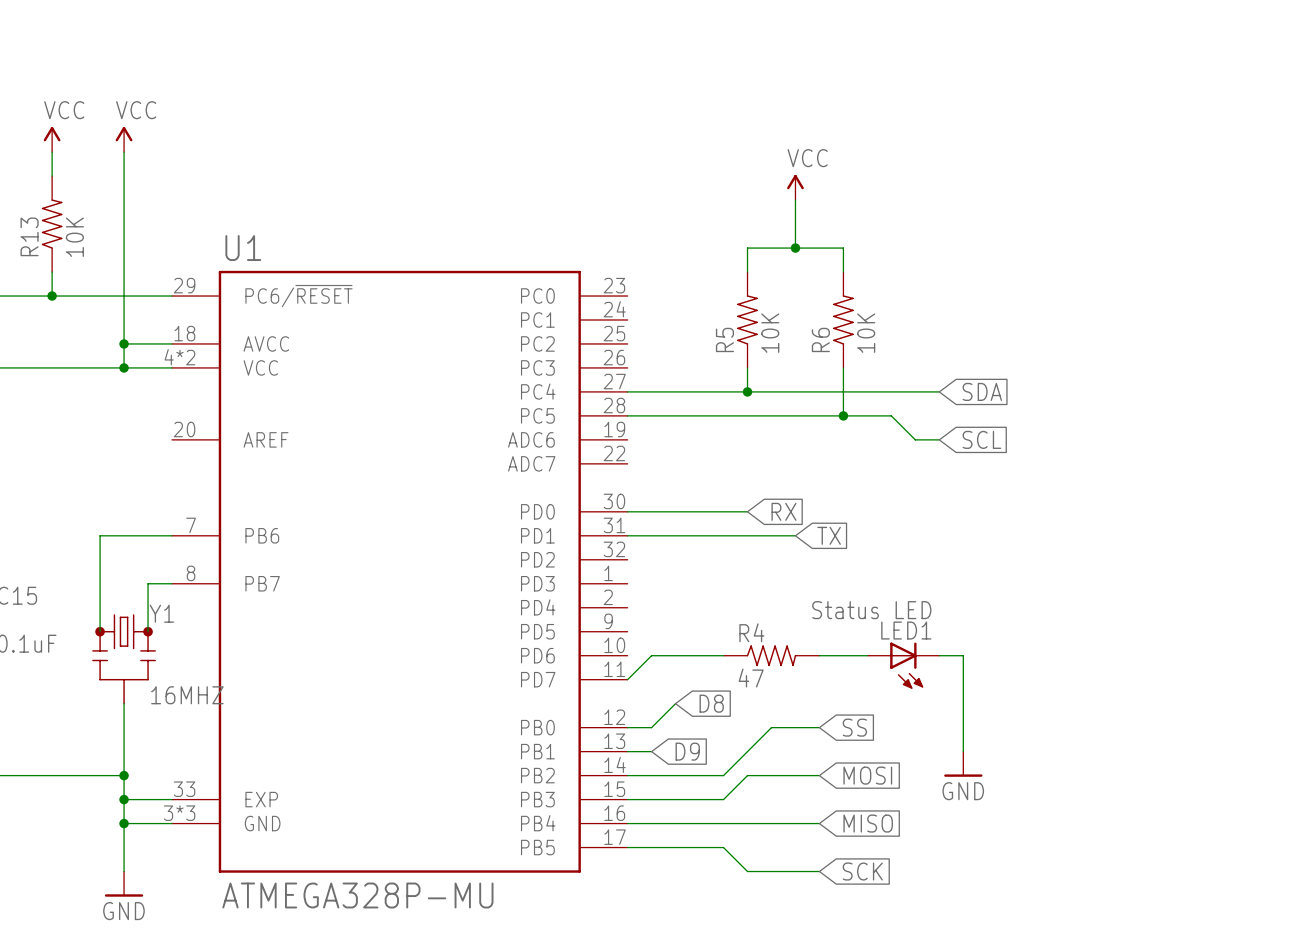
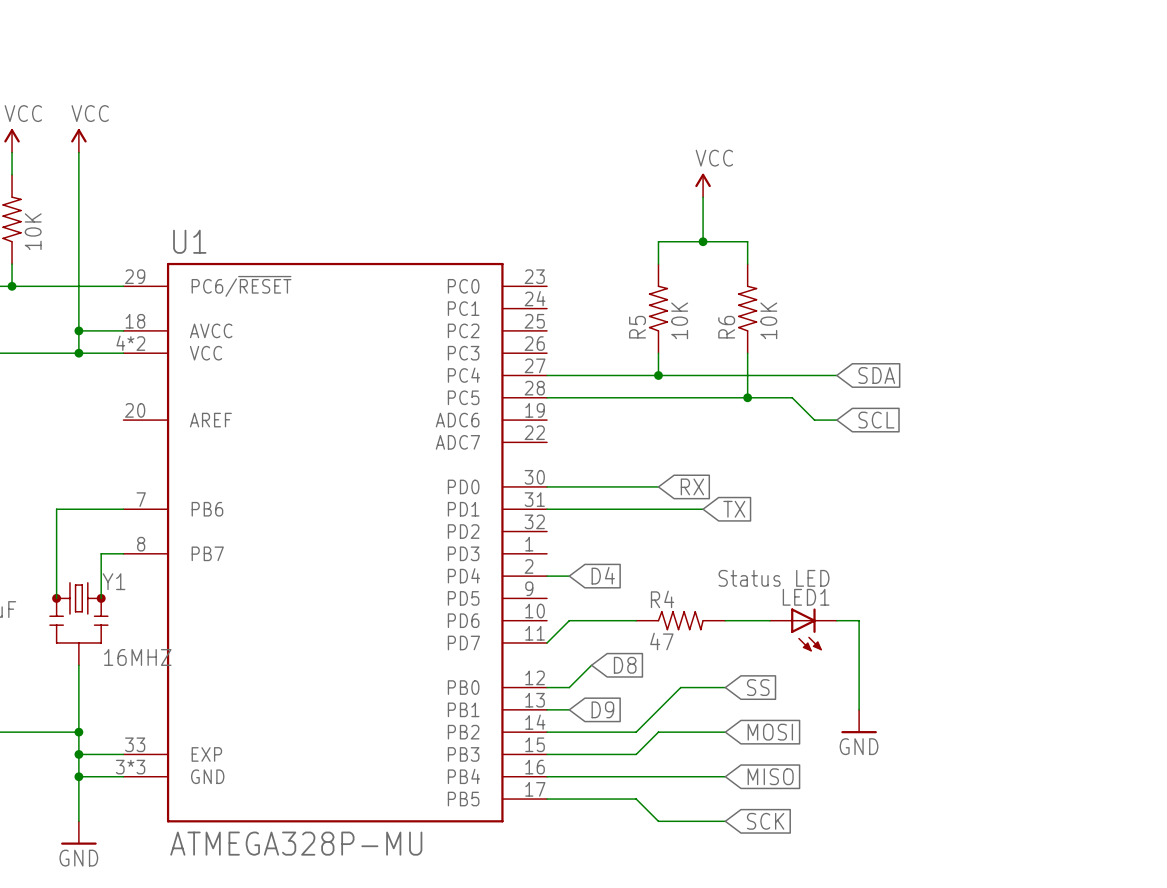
wire: none -> (547, 576) (569, 576)
global label: none -> D4 (603, 575)

